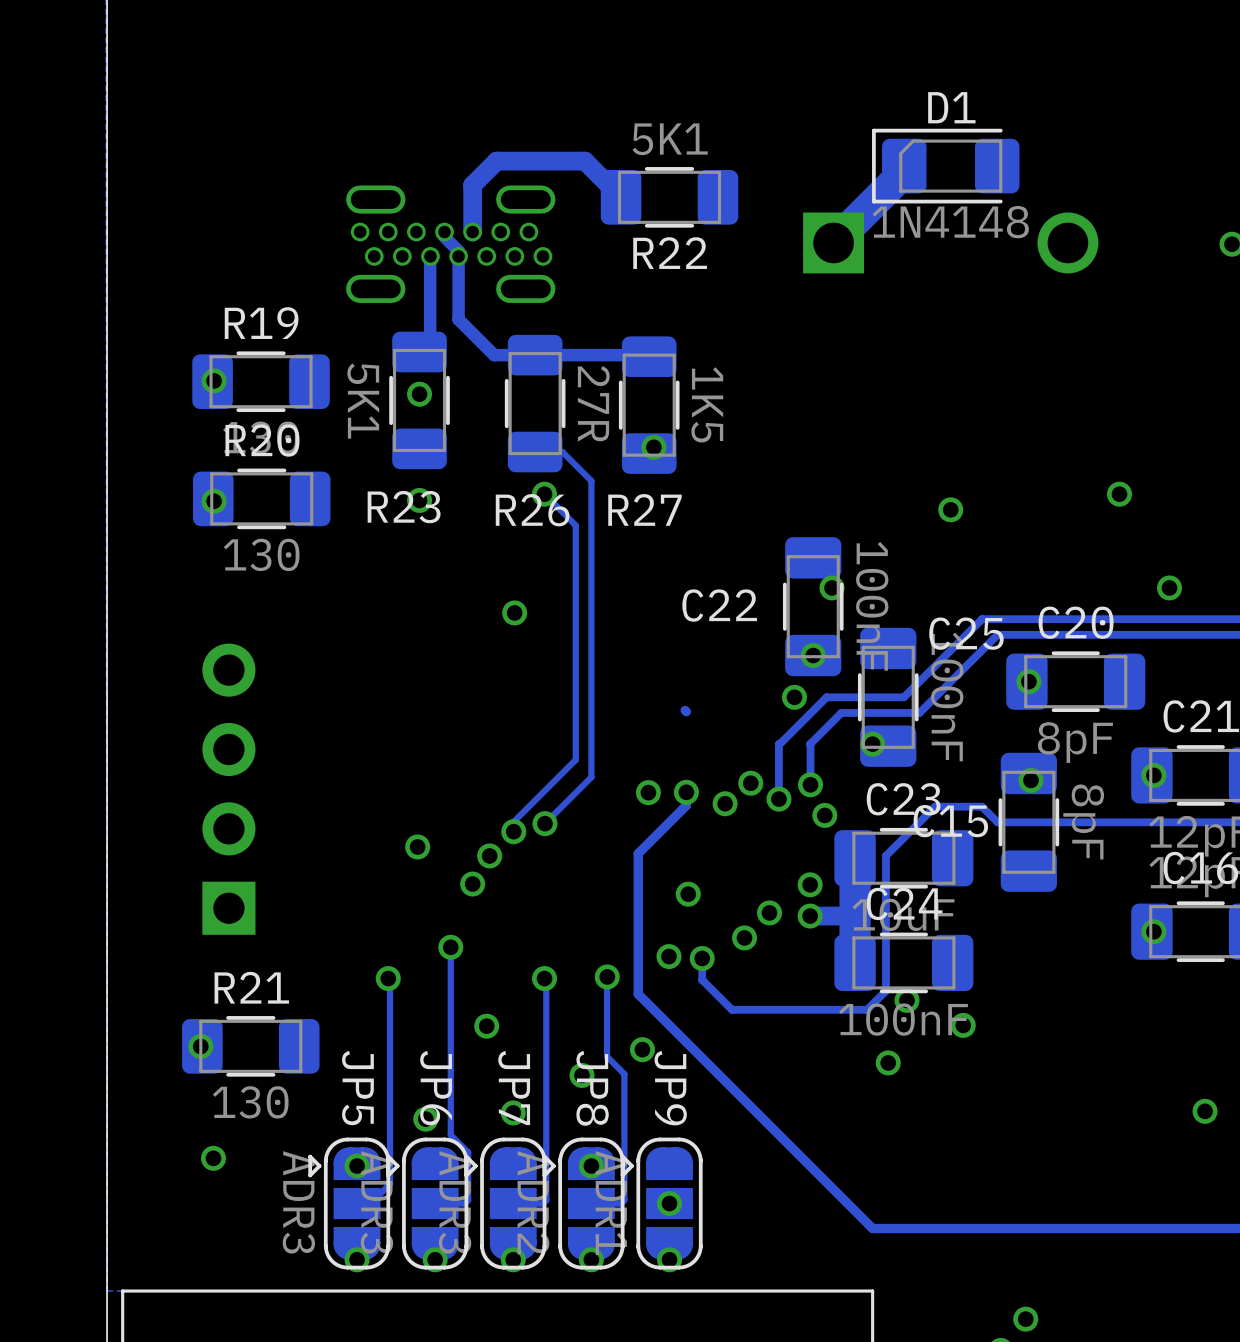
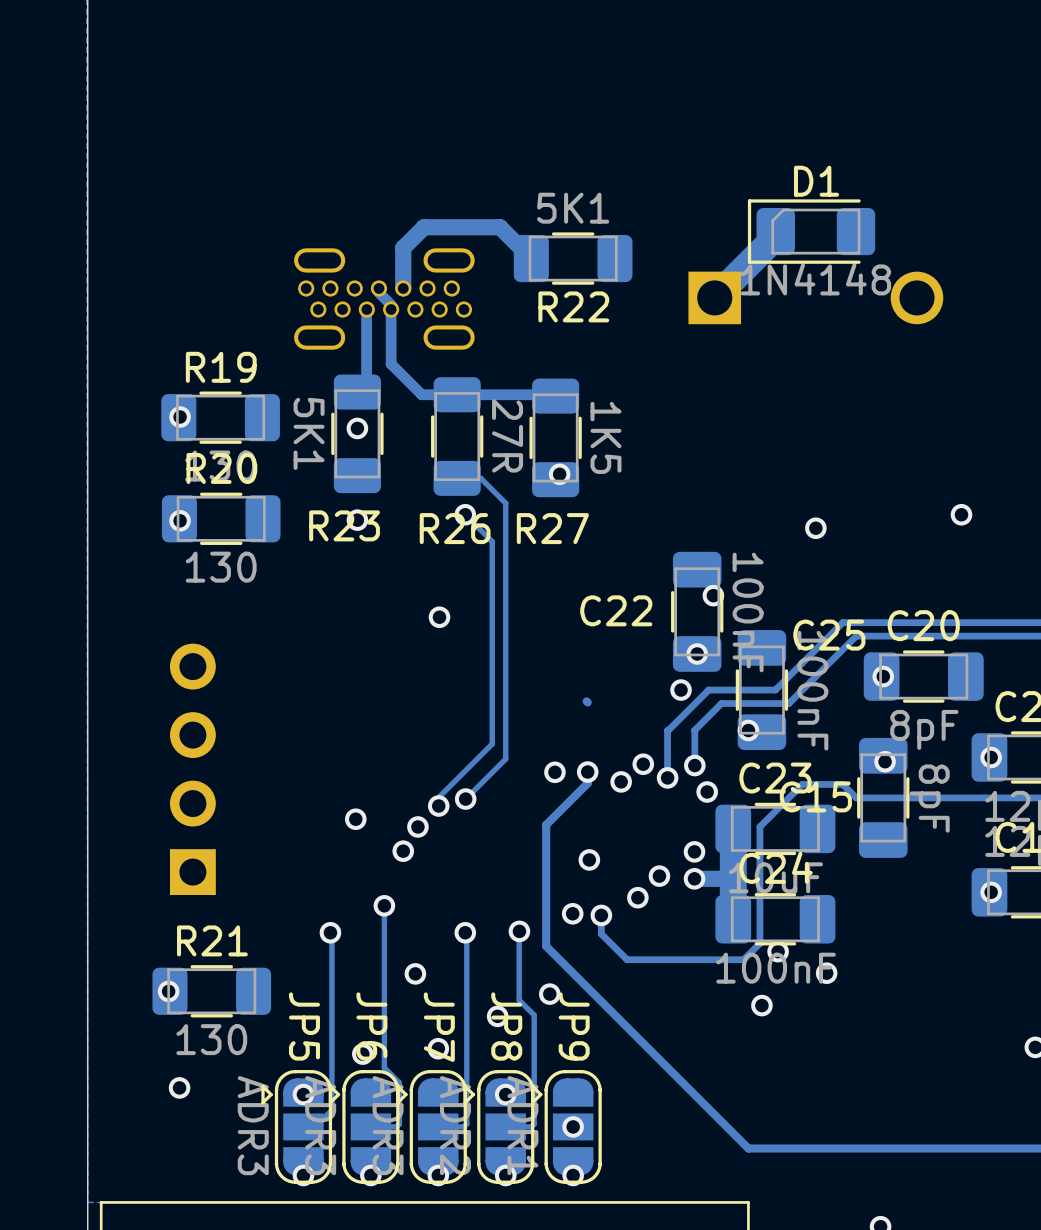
via: (1169, 587) -> none

